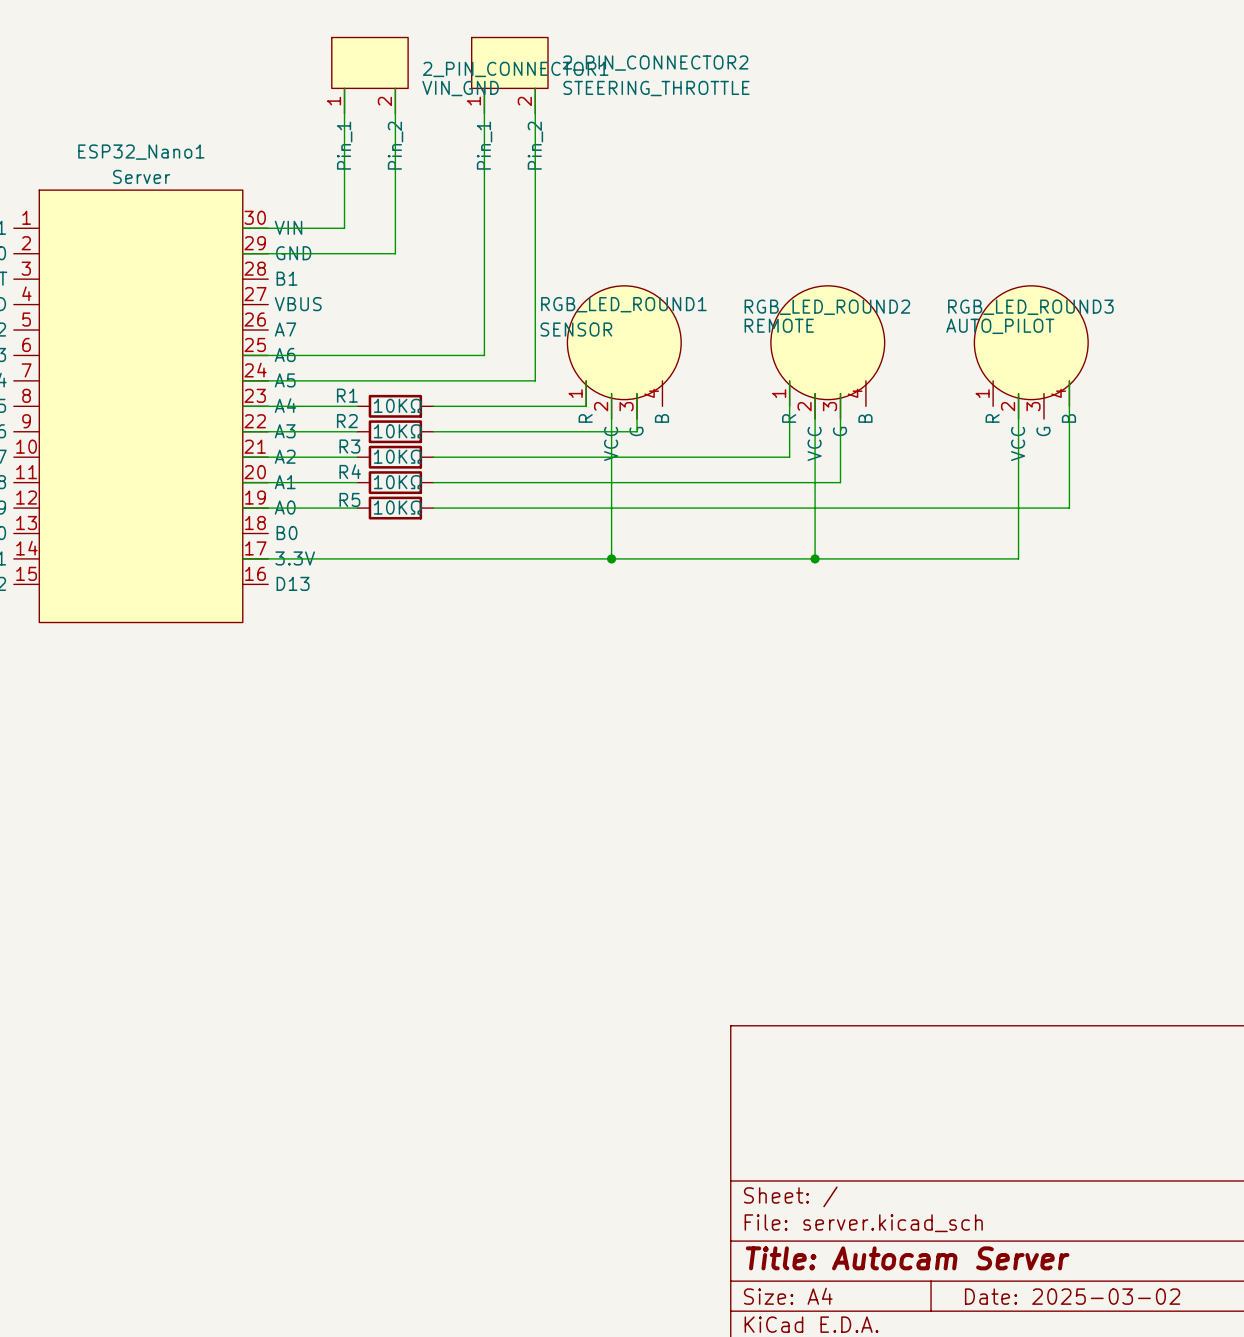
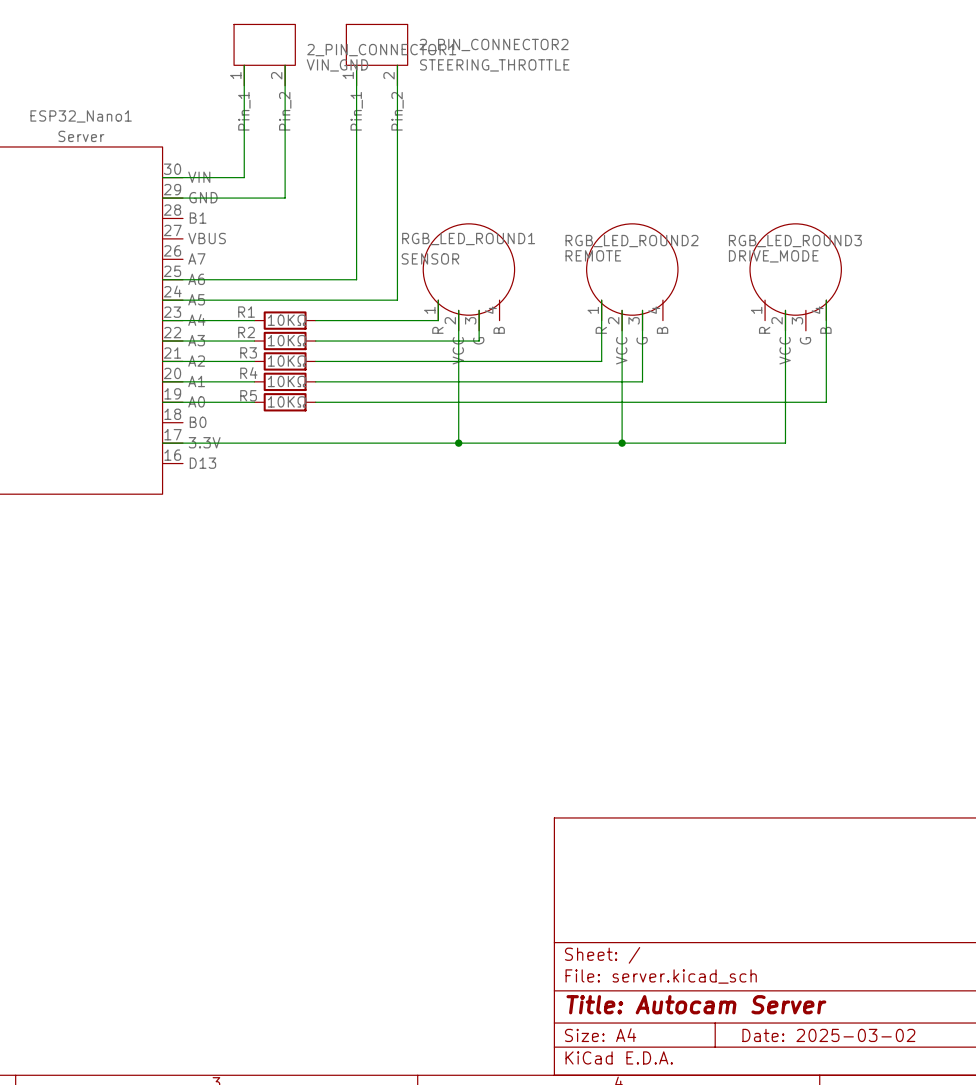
RGB_LED_ROUND3 value: AUTO_PILOT (1000, 326) -> DRIVE_MODE (773, 256)

